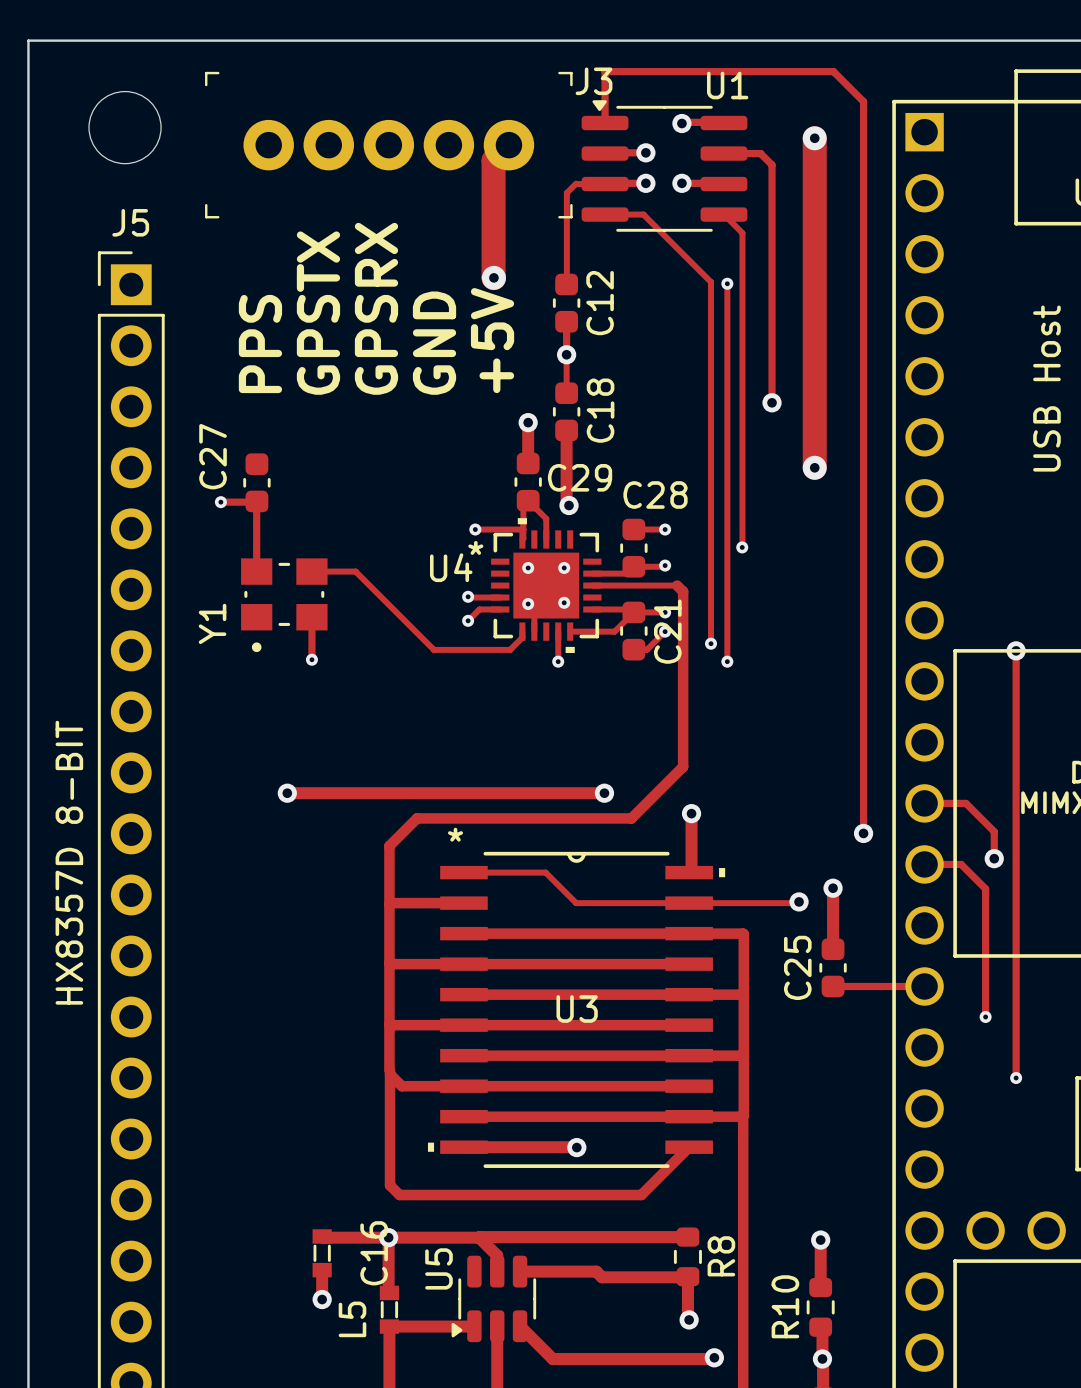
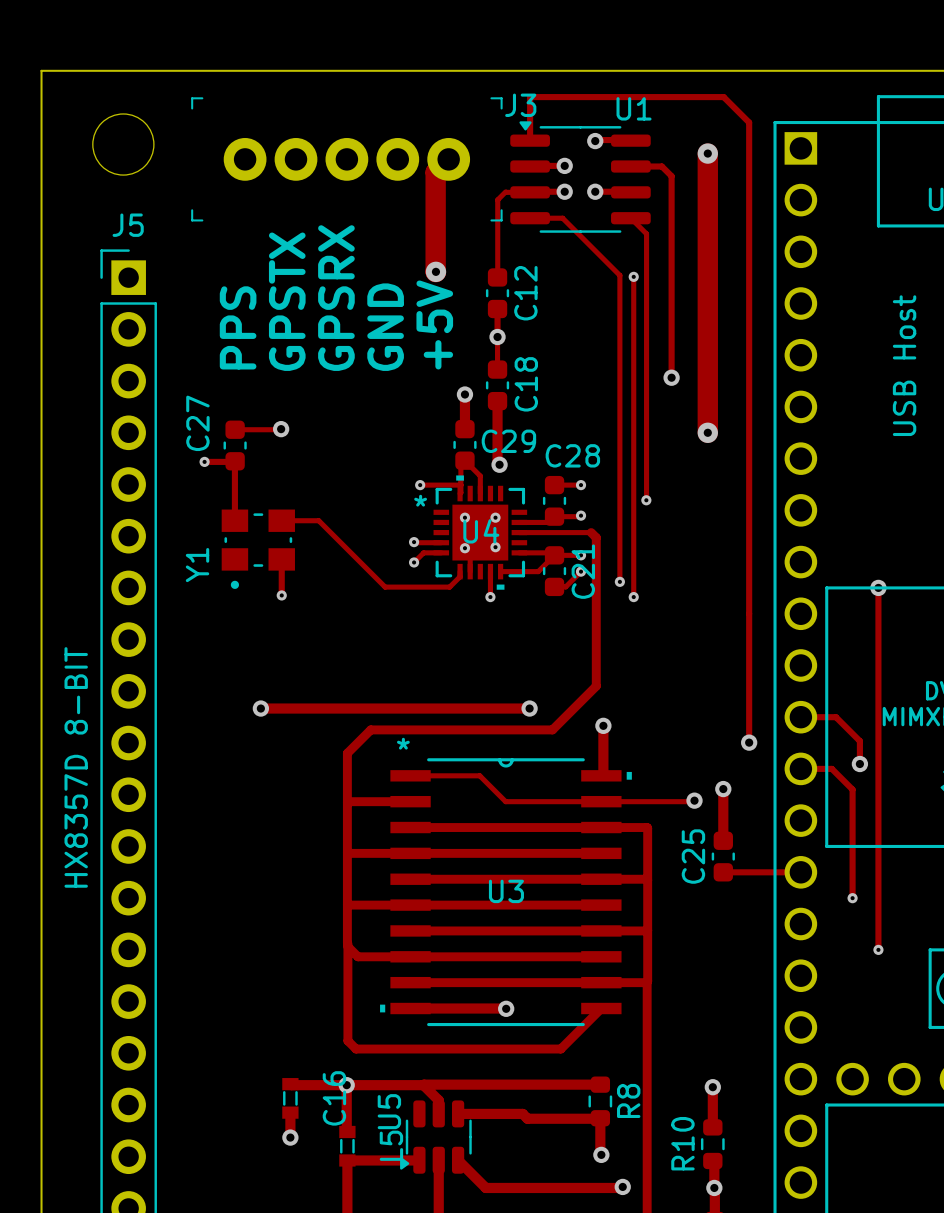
track: none -> (281, 429) (235, 429)
via: none -> (281, 429)
U4 name position: U4 (451, 567) -> U4 (481, 531)
L5 name position: L5 (352, 1319) -> L5 (391, 1145)

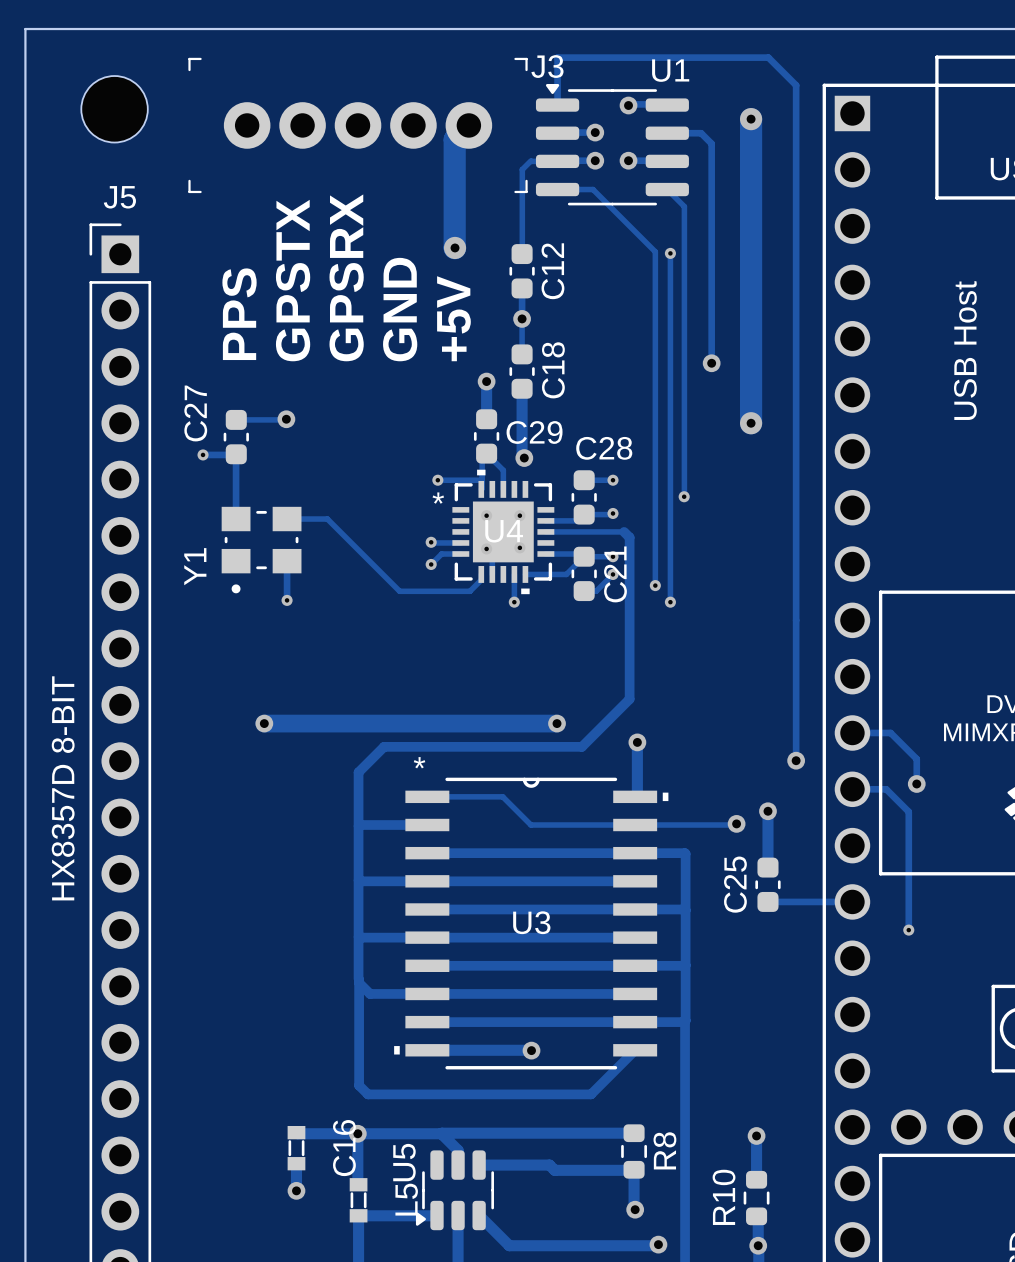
track: (878, 587) (878, 949) -> none
via: (878, 587) -> none
track width: thin (260, 708) (529, 708) -> thick (264, 723) (556, 723)
via: (878, 949) -> none

